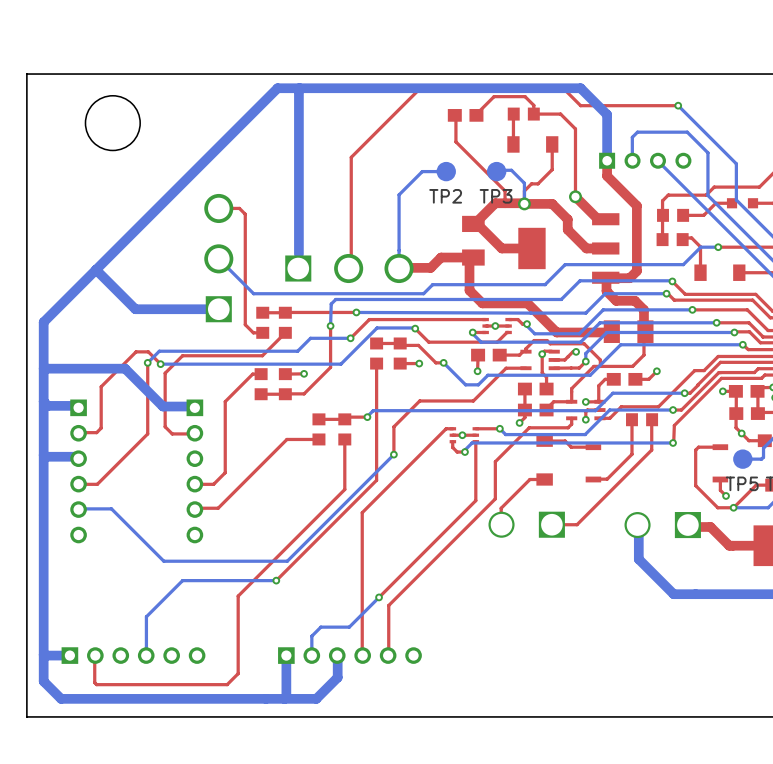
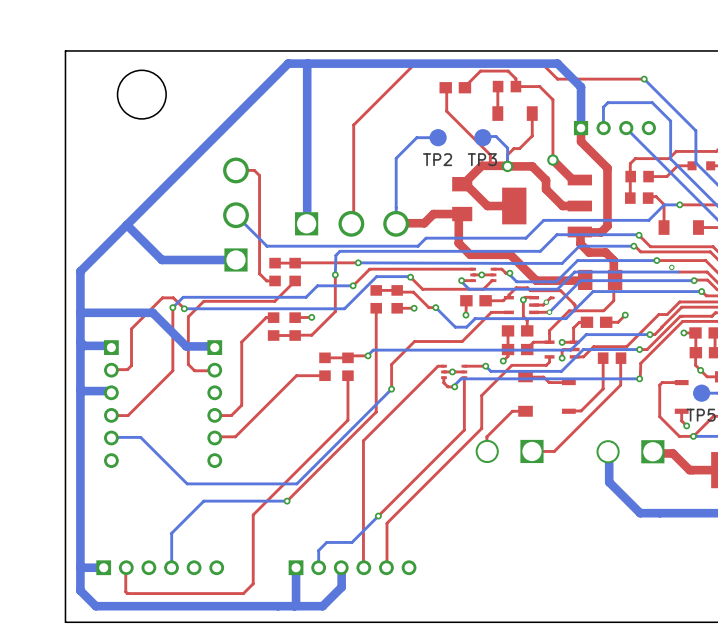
via: none -> (671, 267)
via: (716, 322) -> none
bottom track: (606, 332) (585, 353) (585, 361) -> (580, 280) (549, 312)
via: (576, 351) -> none
via: none -> (546, 302)
top track: (585, 361) (579, 368) (571, 368) -> none
via: (585, 361) -> none
via: none -> (549, 312)

